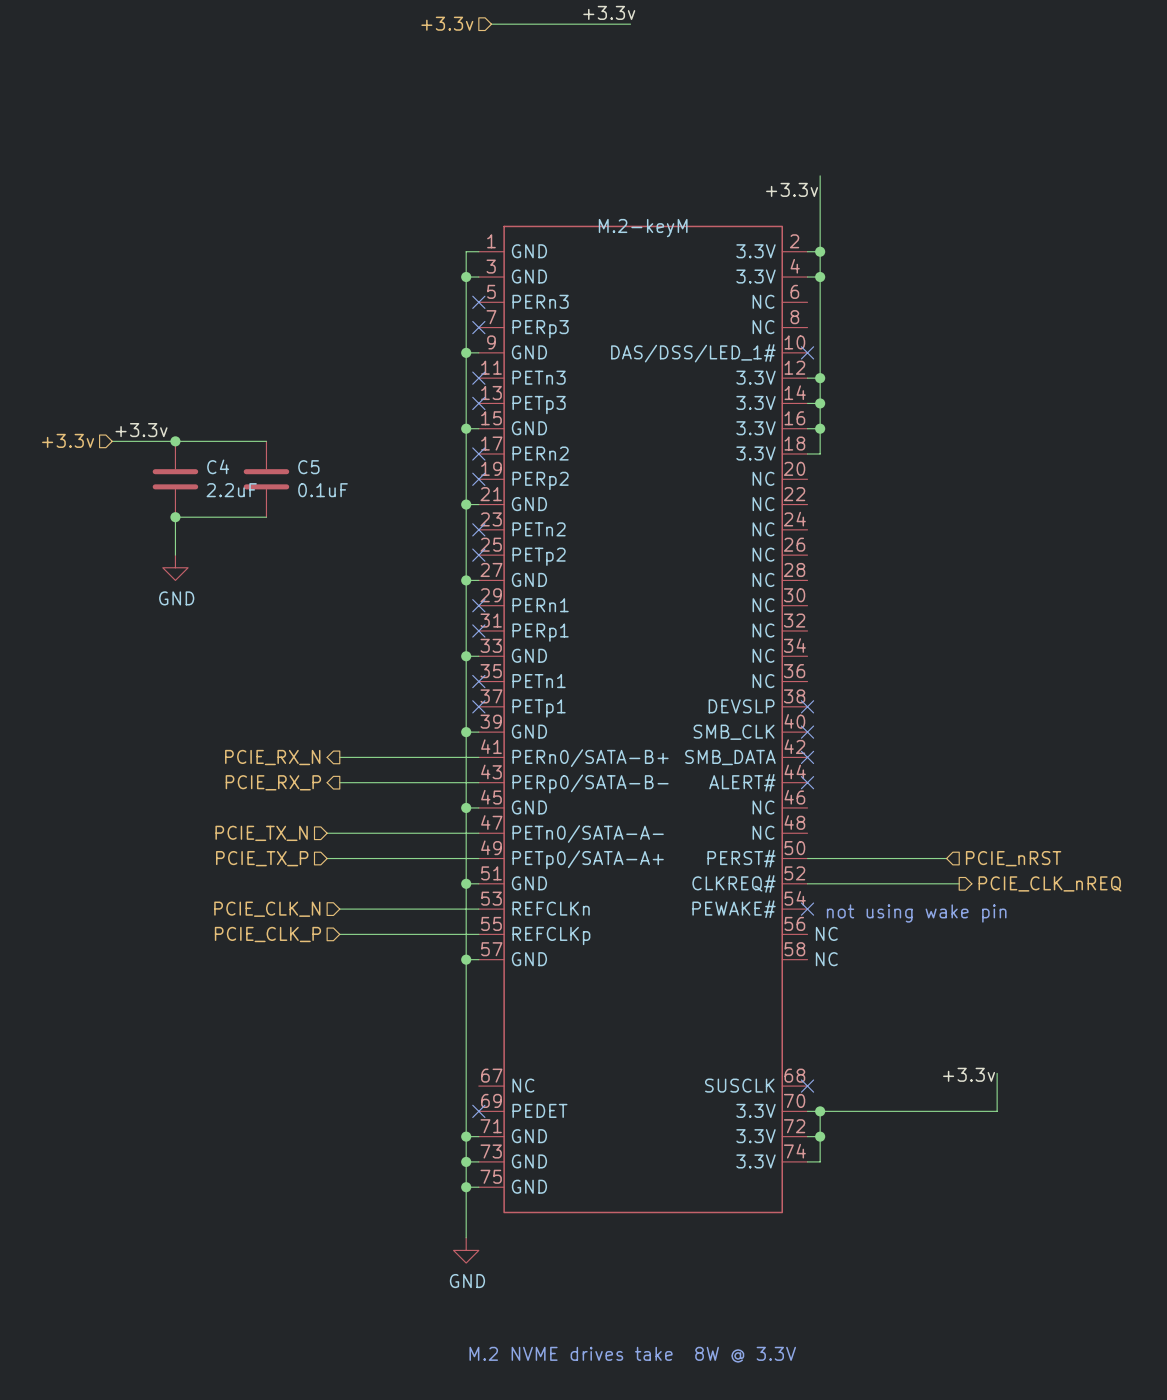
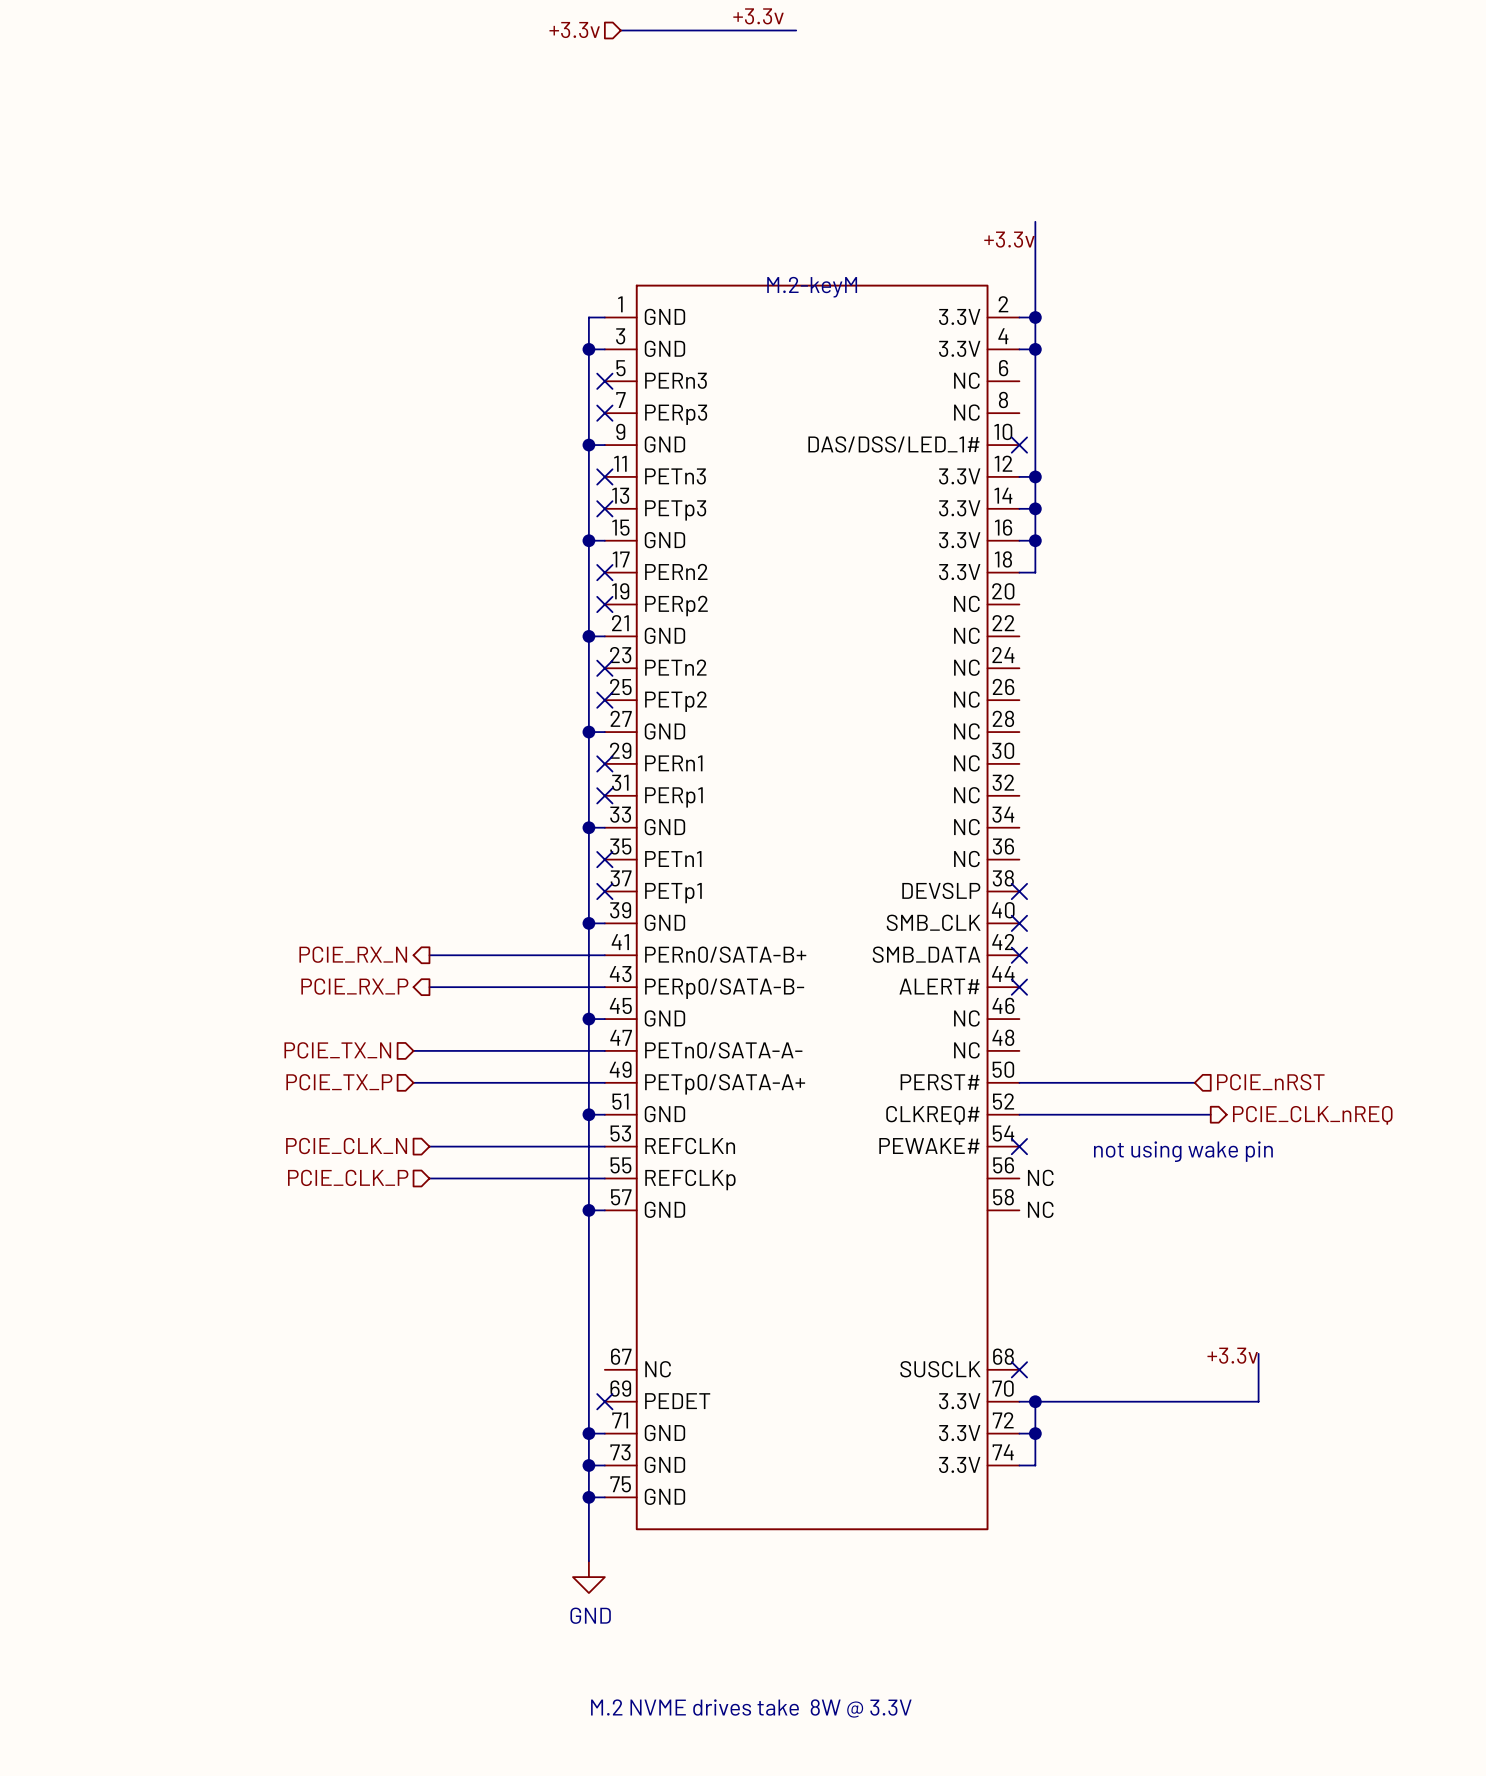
label: +3.3v (141, 430) -> none
hierarchical label: +3.3v (68, 440) -> none
wire: (112, 441) (266, 441) -> none
junction: (175, 441) -> none
C4: 2.2uF (175, 479) -> none
C5: 0.1uF (266, 479) -> none
junction: (175, 517) -> none
wire: (266, 517) (175, 517) (175, 555) -> none
power symbol: GND (175, 567) -> none

